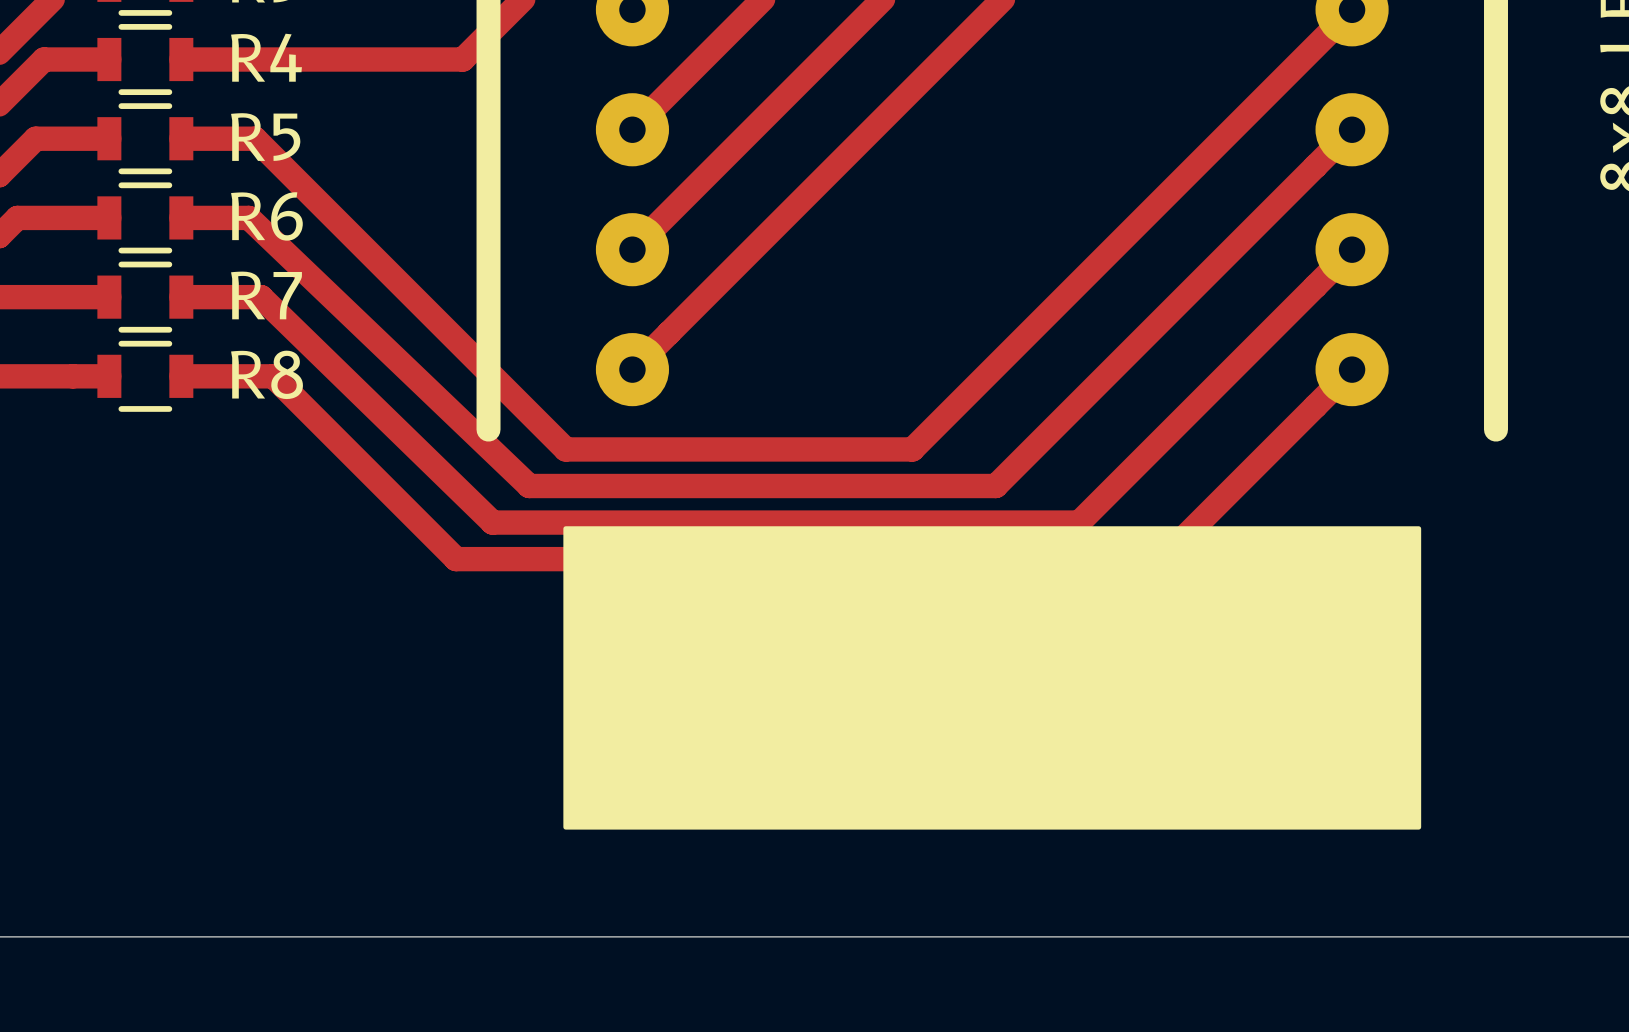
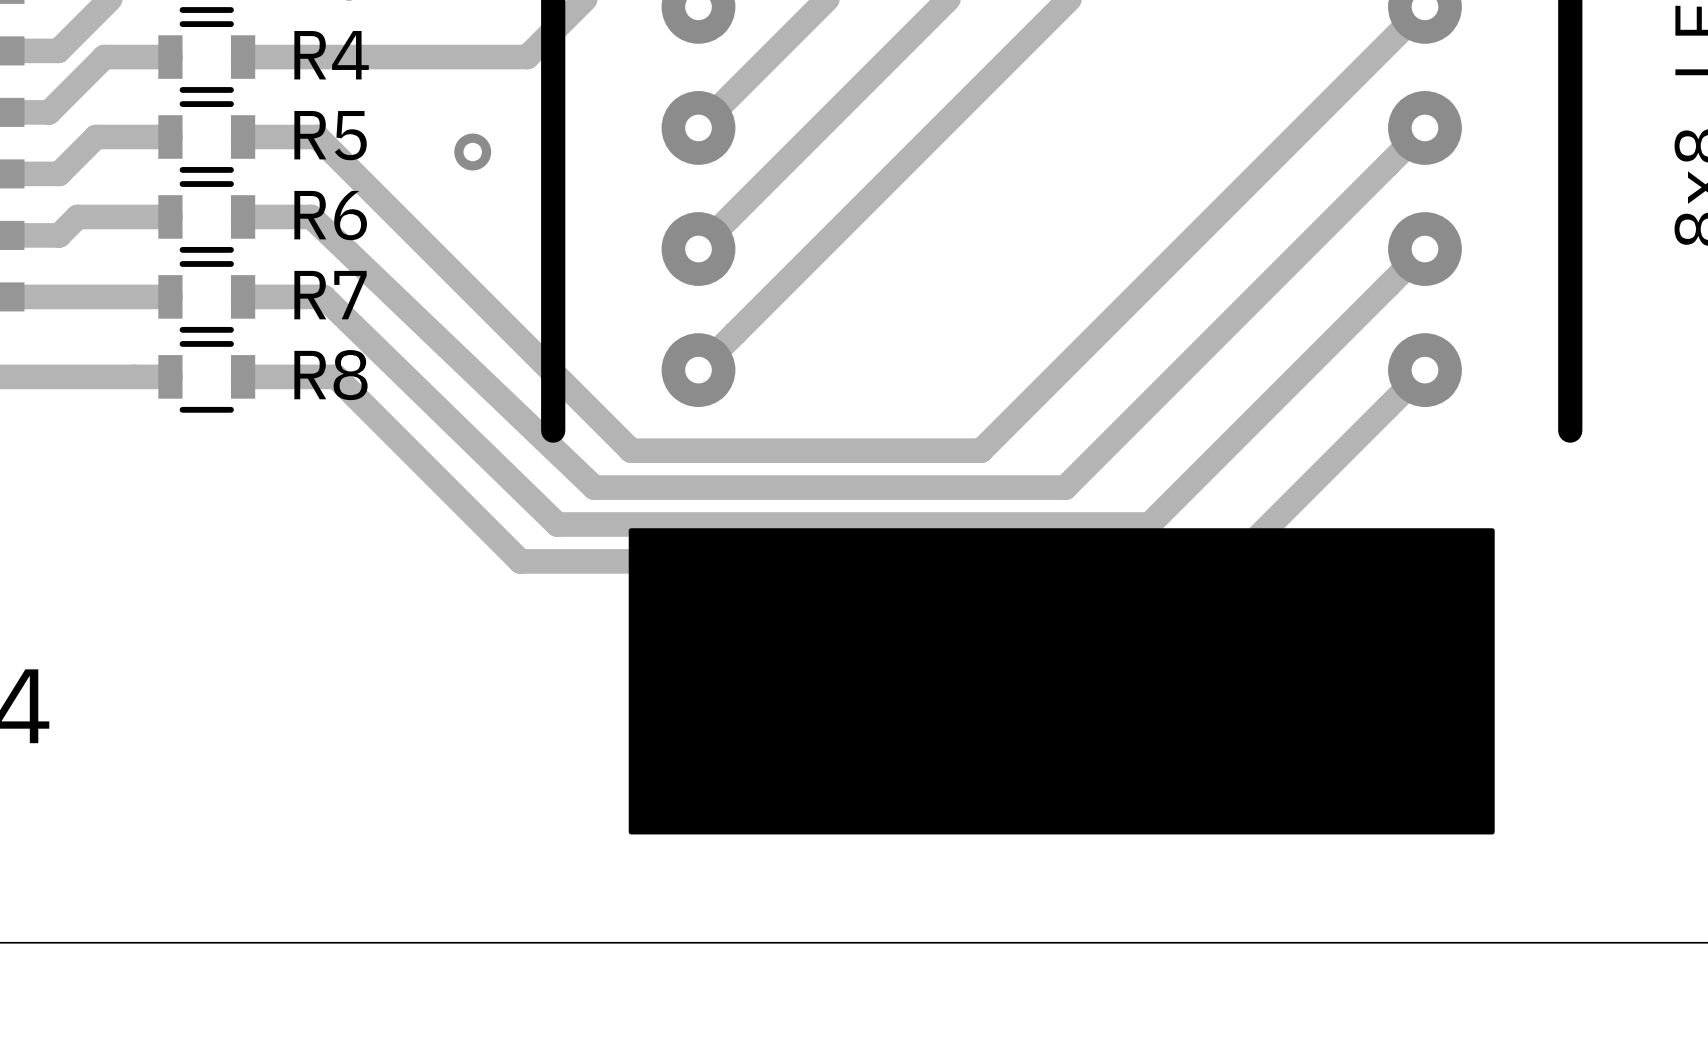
via: none -> (472, 152)

